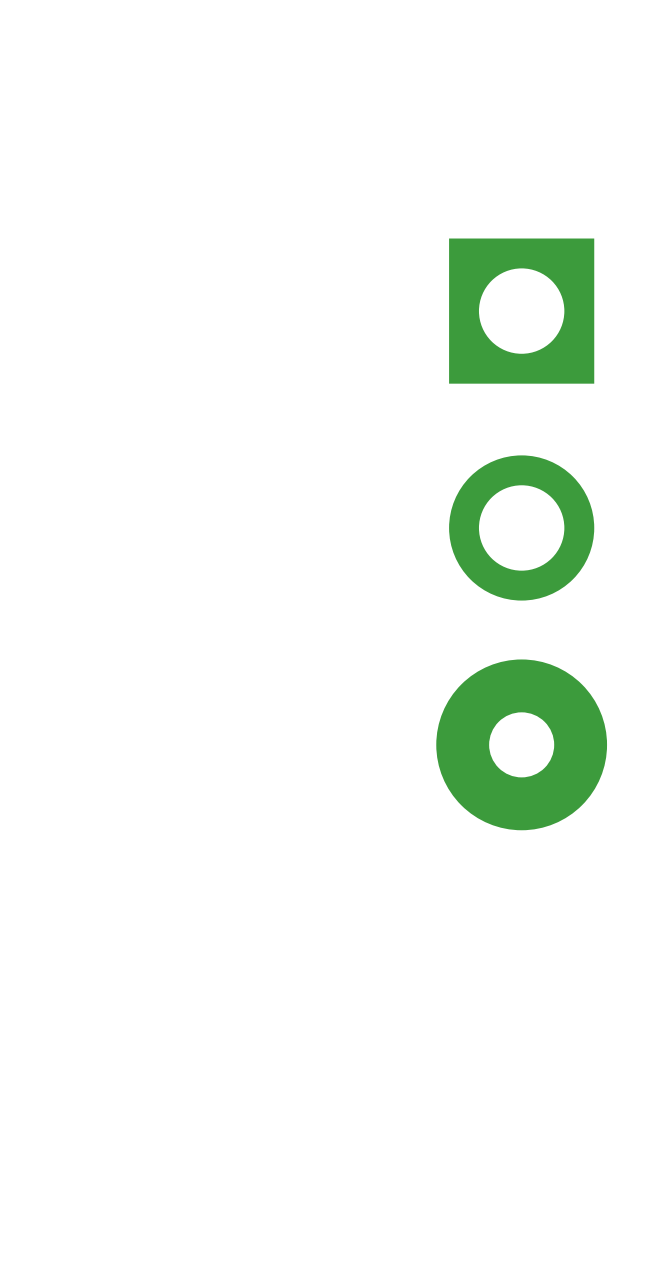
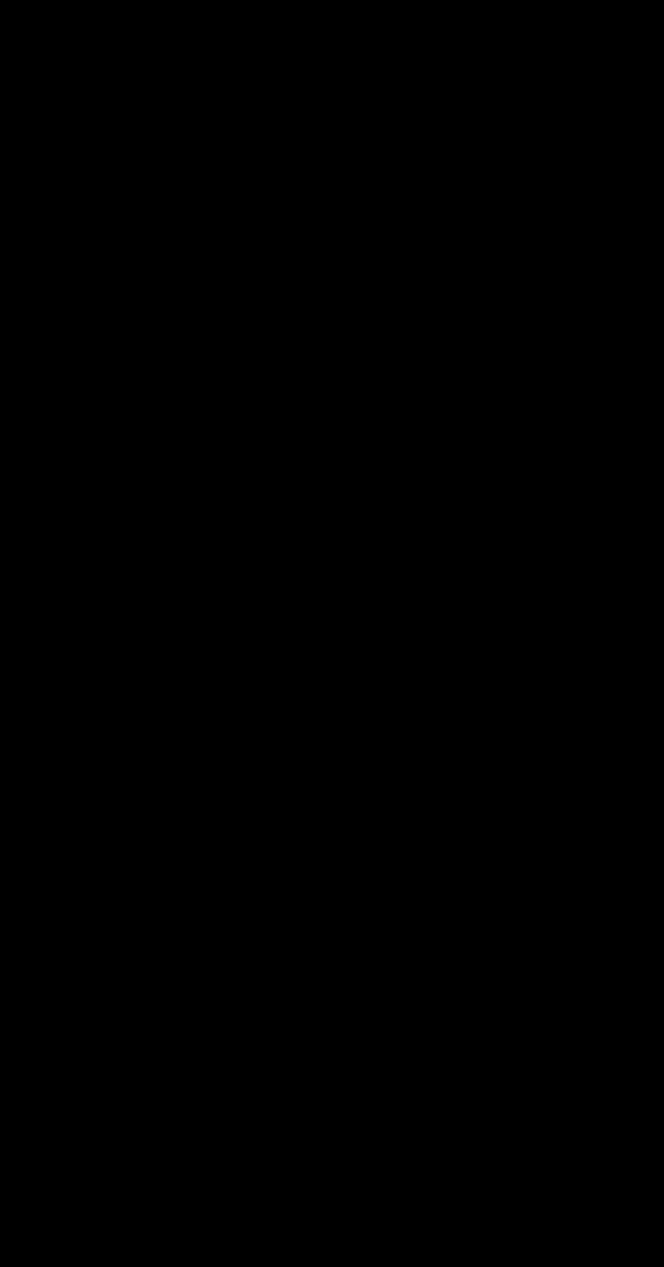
part: (521, 419) -> none
part: (521, 744) -> none

